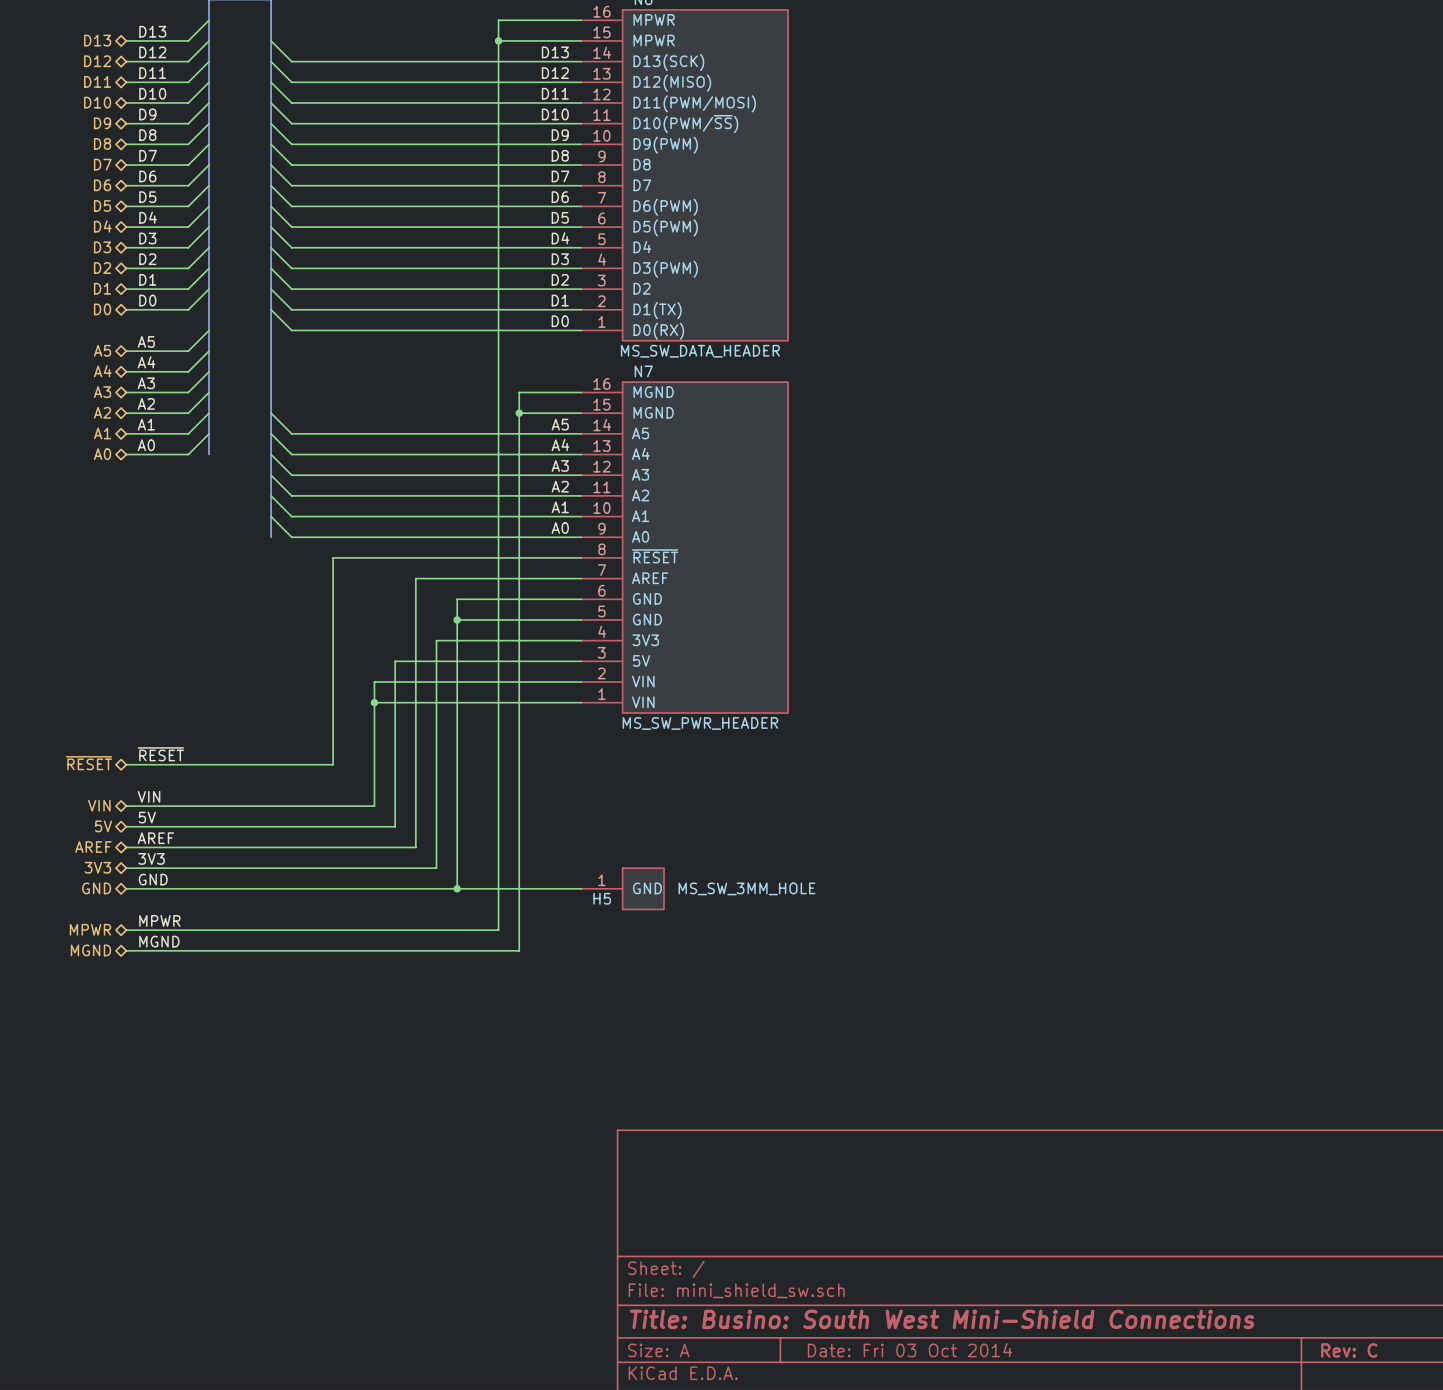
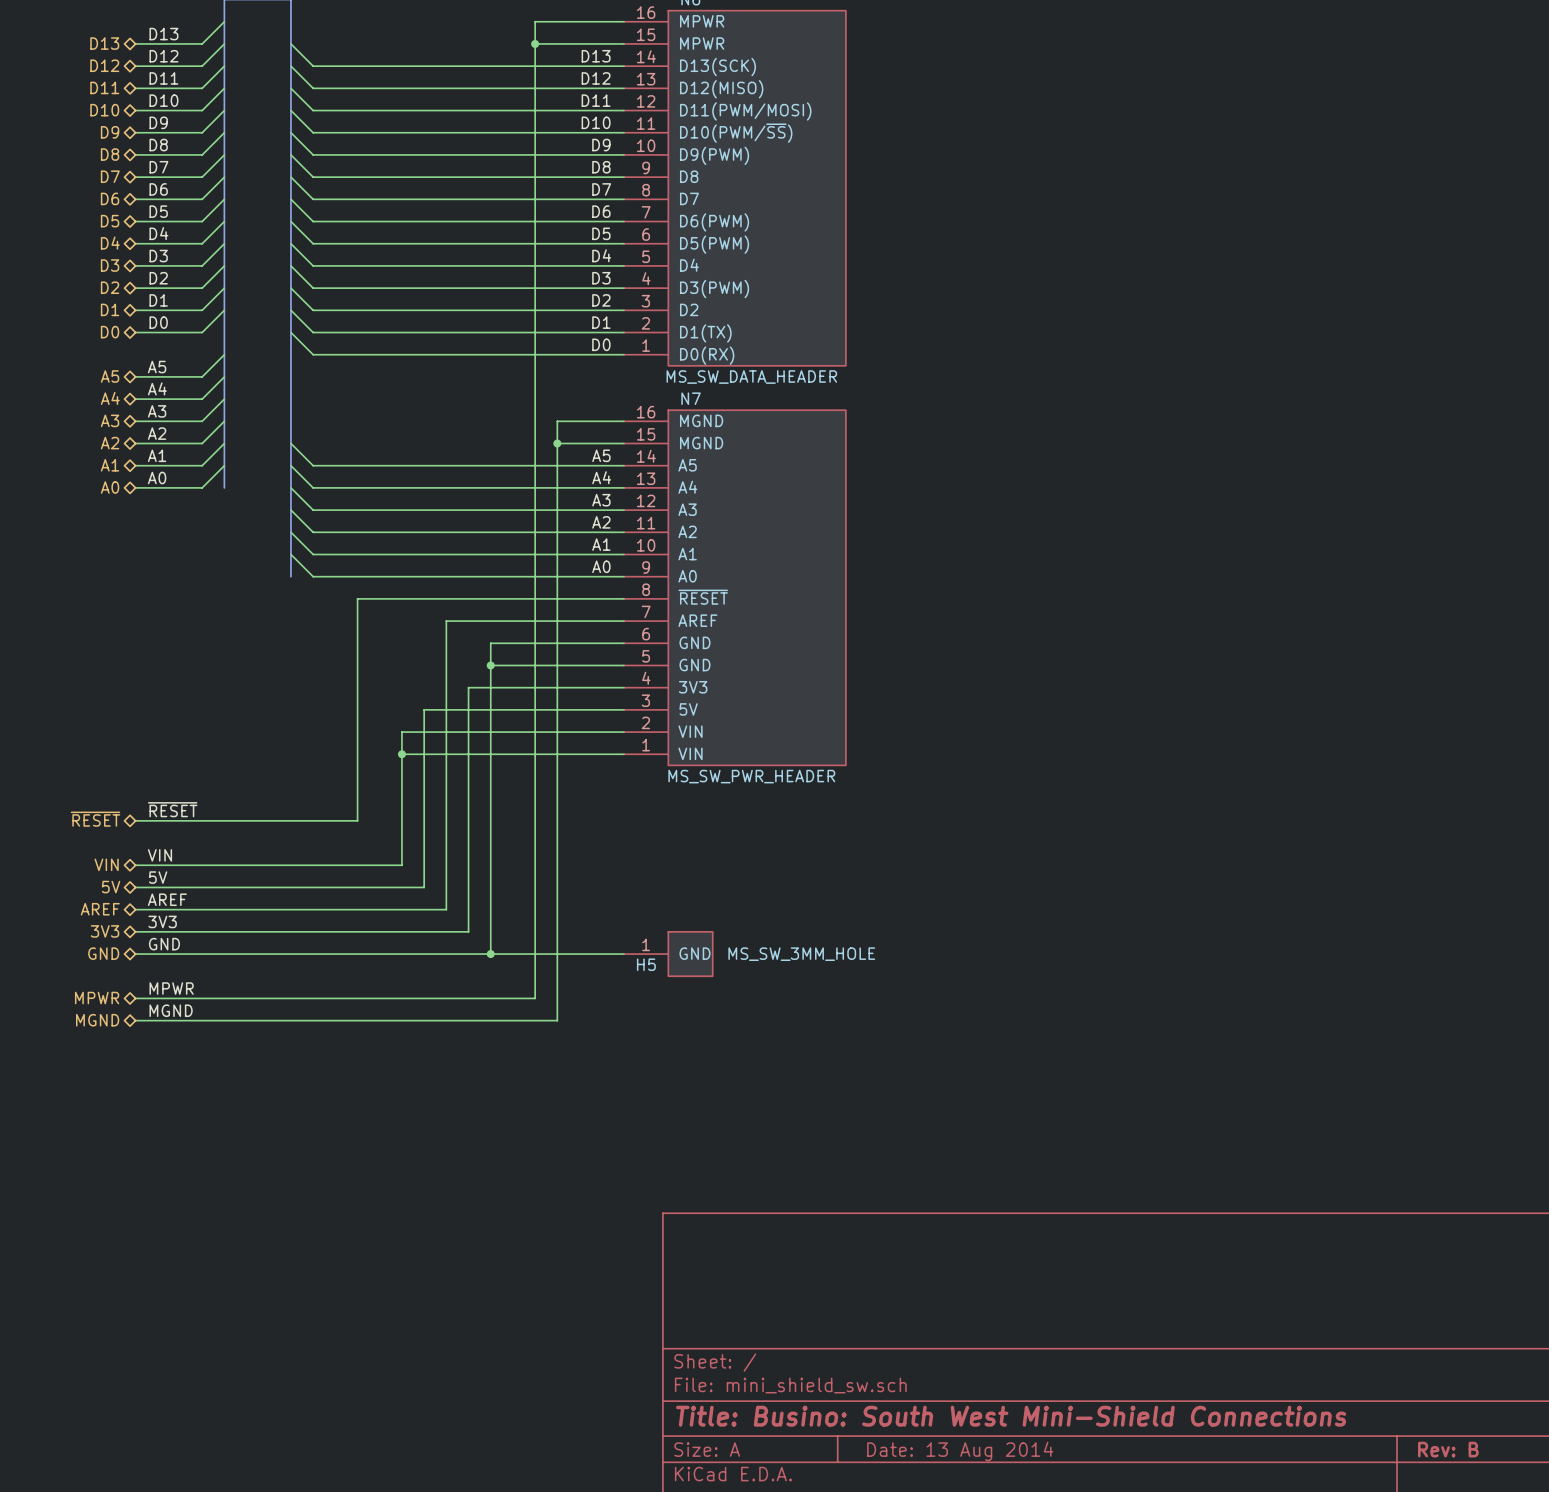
title block: Date: Fri 03 Oct 2014 (910, 1350) -> Date: 13 Aug 2014 (960, 1451)
title block: Rev: C (1349, 1350) -> Rev: B (1448, 1449)

